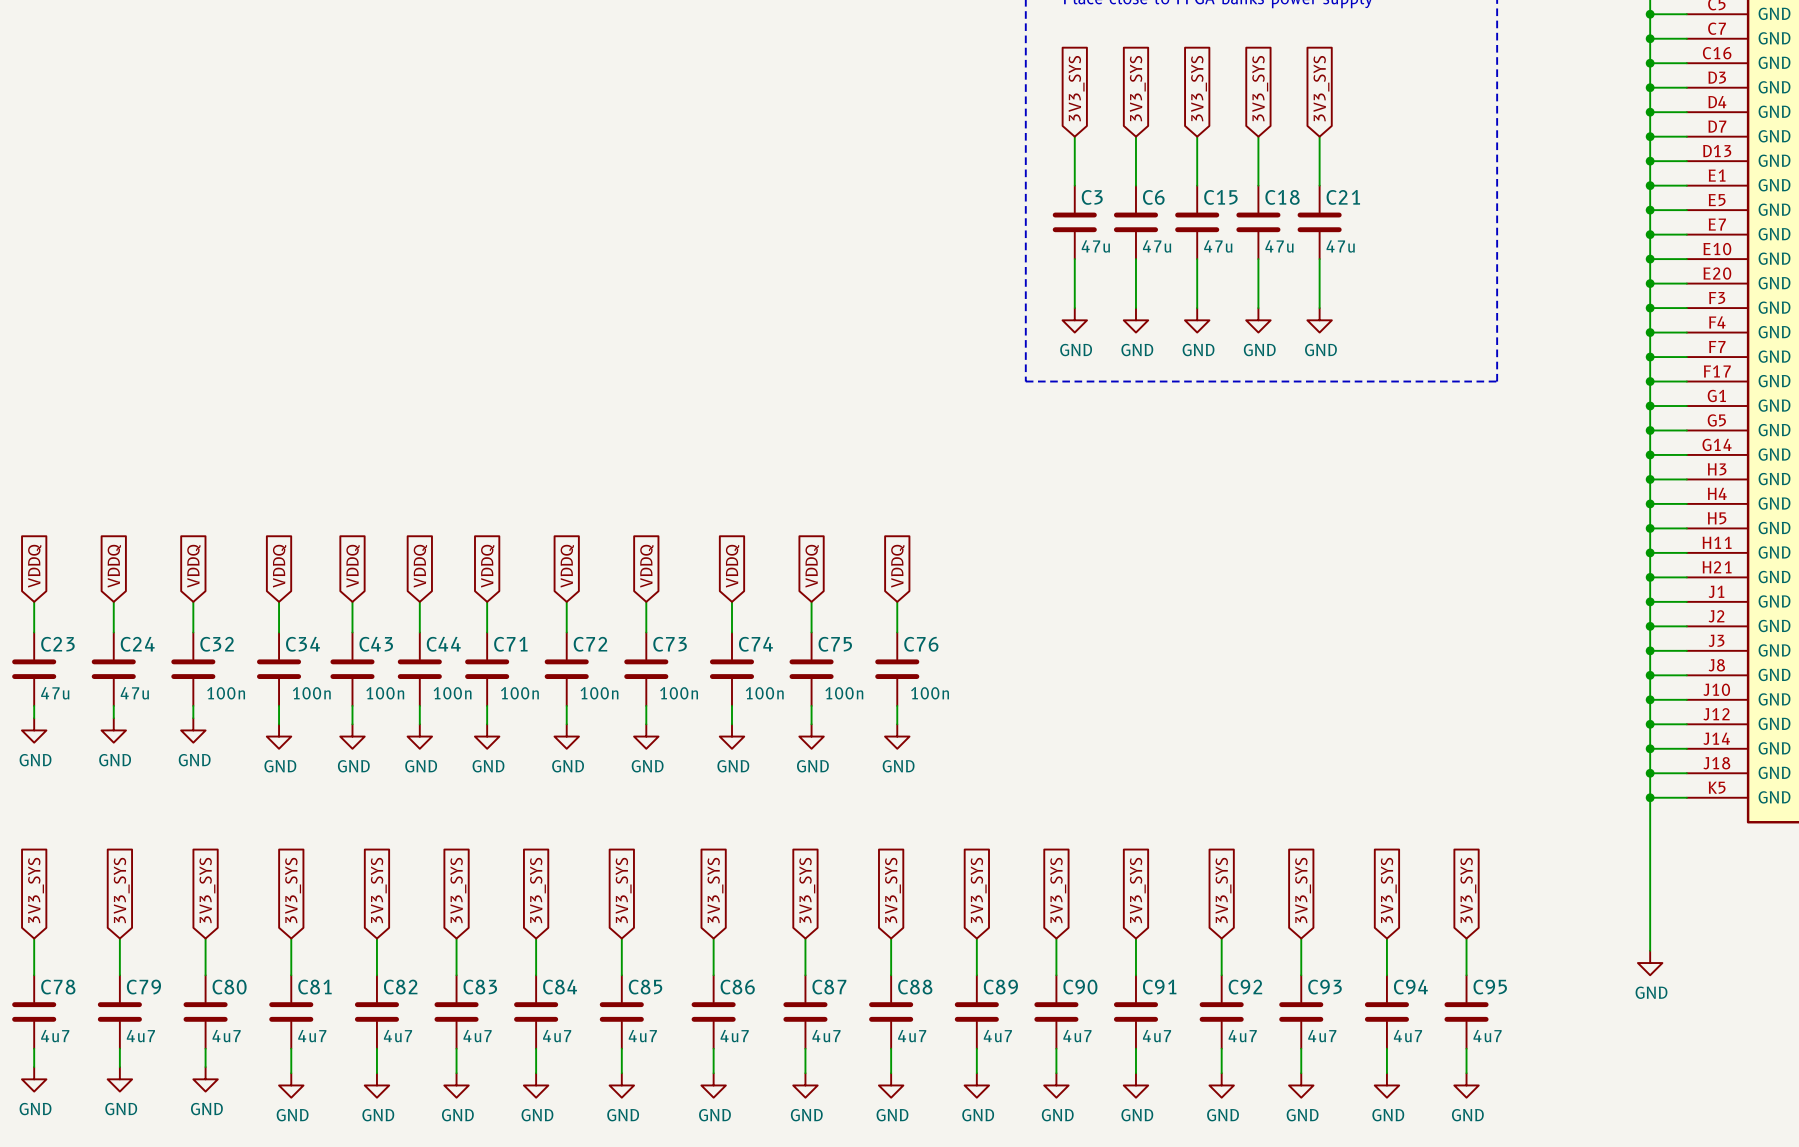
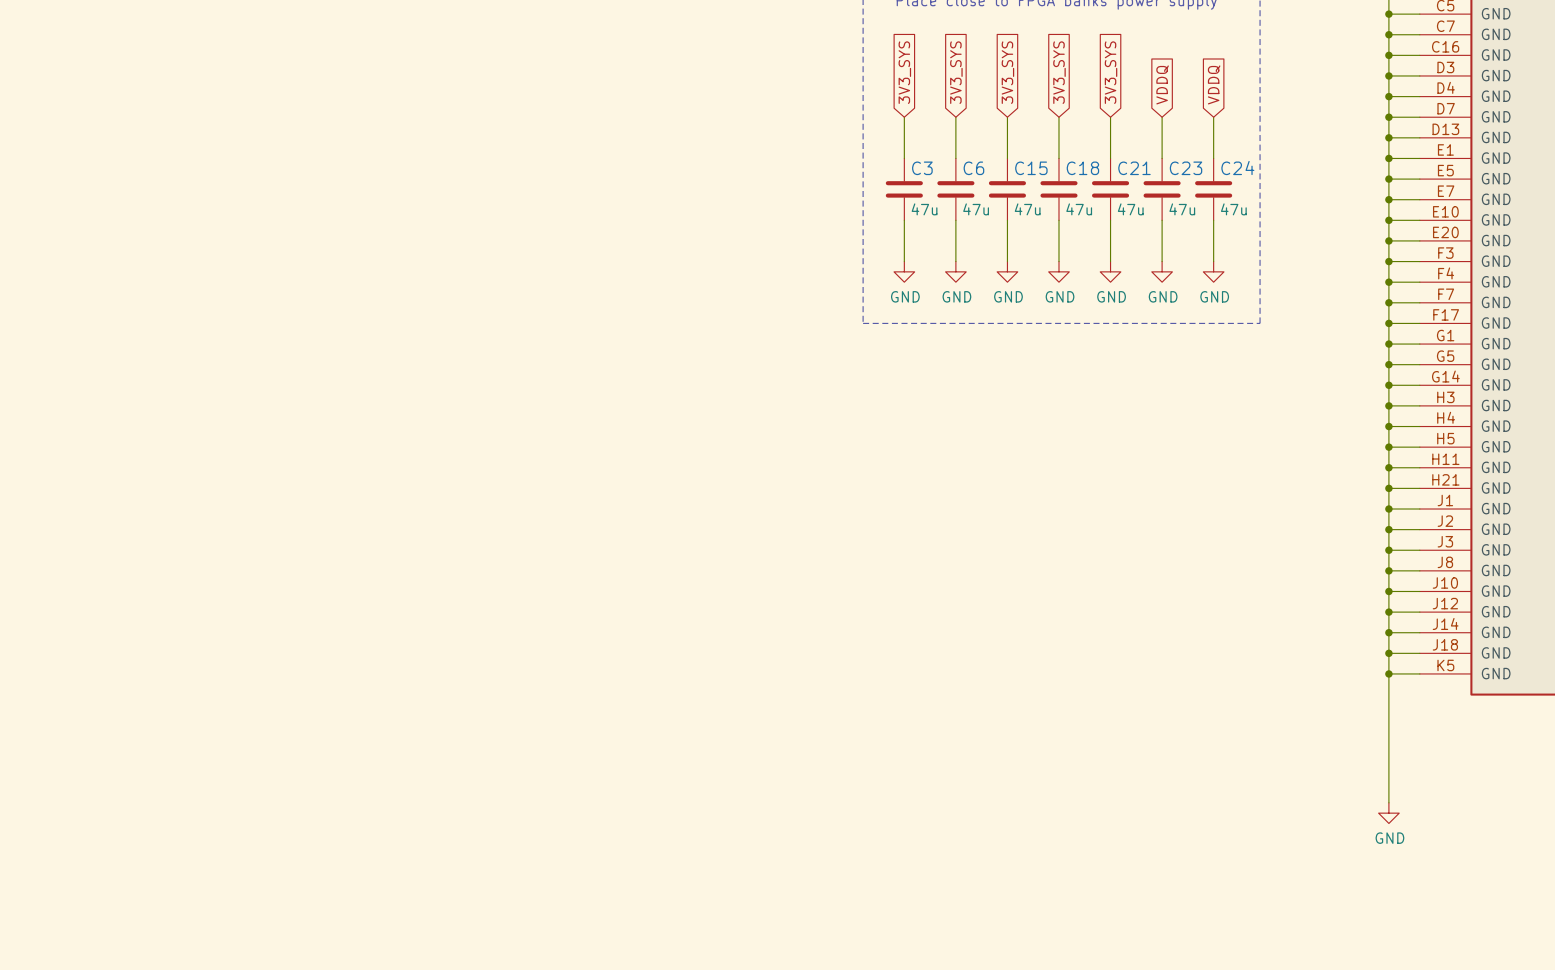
global label: none -> VDDQ (1162, 84)
global label: none -> VDDQ (1214, 84)
wire: none -> (1162, 117) (1162, 158)
wire: none -> (1213, 117) (1213, 158)
wire: none -> (1162, 220) (1162, 261)
wire: none -> (1213, 220) (1213, 261)
power symbol: none -> GND (1162, 271)
power symbol: none -> GND (1213, 271)
global label: VDDQ (34, 566) -> none
global label: VDDQ (114, 566) -> none
global label: VDDQ (193, 566) -> none
global label: VDDQ (279, 566) -> none
global label: VDDQ (353, 566) -> none
global label: VDDQ (420, 566) -> none
global label: VDDQ (487, 566) -> none
global label: VDDQ (567, 566) -> none
global label: VDDQ (646, 566) -> none
global label: VDDQ (732, 566) -> none
global label: VDDQ (812, 566) -> none
global label: VDDQ (897, 566) -> none
wire: (34, 601) (34, 632) -> none
wire: (113, 601) (113, 632) -> none
wire: (193, 601) (193, 632) -> none
wire: (279, 601) (279, 632) -> none
wire: (352, 601) (352, 632) -> none
wire: (419, 601) (419, 632) -> none
wire: (487, 601) (487, 632) -> none
wire: (566, 601) (566, 632) -> none
wire: (646, 601) (646, 632) -> none
wire: (731, 601) (731, 632) -> none
wire: (811, 601) (811, 632) -> none
wire: (897, 601) (897, 632) -> none
C23 position: (34, 669) -> (1162, 189)
C24 position: (113, 669) -> (1213, 189)
C32: (193, 669) -> none
C34: (279, 669) -> none
C43: (352, 669) -> none
C44: (419, 669) -> none
C71: (487, 669) -> none
C72: (566, 669) -> none
C73: (646, 669) -> none
C74: (731, 669) -> none
C75: (811, 669) -> none
C76: (897, 669) -> none
wire: (34, 705) (34, 718) -> none
wire: (113, 705) (113, 718) -> none
wire: (193, 705) (193, 718) -> none
wire: (279, 705) (279, 724) -> none
wire: (352, 705) (352, 724) -> none
wire: (419, 705) (419, 724) -> none
wire: (487, 705) (487, 724) -> none
wire: (566, 705) (566, 724) -> none
wire: (646, 705) (646, 724) -> none
wire: (731, 705) (731, 724) -> none
wire: (811, 705) (811, 724) -> none
wire: (897, 705) (897, 724) -> none
power symbol: GND (34, 730) -> none
power symbol: GND (113, 730) -> none
power symbol: GND (193, 730) -> none
power symbol: GND (279, 736) -> none
power symbol: GND (352, 736) -> none
power symbol: GND (419, 736) -> none
power symbol: GND (487, 736) -> none
power symbol: GND (566, 736) -> none
power symbol: GND (646, 736) -> none
power symbol: GND (731, 736) -> none
power symbol: GND (811, 736) -> none
power symbol: GND (897, 736) -> none
global label: 3V3_SYS (36, 890) -> none
global label: 3V3_SYS (121, 890) -> none
global label: 3V3_SYS (207, 890) -> none
global label: 3V3_SYS (293, 890) -> none
global label: 3V3_SYS (378, 890) -> none
global label: 3V3_SYS (458, 890) -> none
global label: 3V3_SYS (537, 890) -> none
global label: 3V3_SYS (623, 890) -> none
global label: 3V3_SYS (715, 890) -> none
global label: 3V3_SYS (807, 890) -> none
global label: 3V3_SYS (892, 890) -> none
global label: 3V3_SYS (978, 890) -> none
global label: 3V3_SYS (1058, 890) -> none
global label: 3V3_SYS (1137, 890) -> none
global label: 3V3_SYS (1223, 890) -> none
global label: 3V3_SYS (1303, 890) -> none
global label: 3V3_SYS (1388, 890) -> none
global label: 3V3_SYS (1468, 890) -> none
wire: (34, 938) (34, 975) -> none
wire: (119, 938) (119, 975) -> none
wire: (205, 938) (205, 975) -> none
wire: (291, 938) (291, 975) -> none
wire: (376, 938) (376, 975) -> none
wire: (456, 938) (456, 975) -> none
wire: (536, 938) (536, 975) -> none
wire: (621, 938) (621, 975) -> none
wire: (713, 938) (713, 975) -> none
wire: (805, 938) (805, 975) -> none
wire: (891, 938) (891, 975) -> none
wire: (976, 938) (976, 975) -> none
wire: (1056, 938) (1056, 975) -> none
wire: (1135, 938) (1135, 975) -> none
wire: (1221, 938) (1221, 975) -> none
wire: (1301, 938) (1301, 975) -> none
wire: (1386, 938) (1386, 975) -> none
wire: (1466, 938) (1466, 975) -> none
C78: (34, 1011) -> none
C79: (119, 1011) -> none
C80: (205, 1011) -> none
C81: (291, 1011) -> none
C82: (376, 1011) -> none
C83: (456, 1011) -> none
C84: (536, 1011) -> none
C85: (621, 1011) -> none
C86: (713, 1011) -> none
C87: (805, 1011) -> none
C88: (891, 1011) -> none
C89: (976, 1011) -> none
C90: (1056, 1011) -> none
C91: (1135, 1011) -> none
C92: (1221, 1011) -> none
C93: (1301, 1011) -> none
C94: (1386, 1011) -> none
C95: (1466, 1011) -> none
wire: (34, 1048) (34, 1067) -> none
wire: (119, 1048) (119, 1067) -> none
wire: (205, 1048) (205, 1067) -> none
wire: (291, 1048) (291, 1073) -> none
wire: (376, 1048) (376, 1073) -> none
wire: (456, 1048) (456, 1073) -> none
wire: (536, 1048) (536, 1073) -> none
wire: (621, 1048) (621, 1073) -> none
wire: (713, 1048) (713, 1073) -> none
wire: (805, 1048) (805, 1073) -> none
wire: (891, 1048) (891, 1073) -> none
wire: (976, 1048) (976, 1073) -> none
wire: (1056, 1048) (1056, 1073) -> none
wire: (1135, 1048) (1135, 1073) -> none
wire: (1221, 1048) (1221, 1073) -> none
wire: (1301, 1048) (1301, 1073) -> none
wire: (1386, 1048) (1386, 1073) -> none
wire: (1466, 1048) (1466, 1073) -> none
power symbol: GND (34, 1079) -> none
power symbol: GND (119, 1079) -> none
power symbol: GND (205, 1079) -> none
power symbol: GND (291, 1085) -> none
power symbol: GND (376, 1085) -> none
power symbol: GND (456, 1085) -> none
power symbol: GND (536, 1085) -> none
power symbol: GND (621, 1085) -> none
power symbol: GND (713, 1085) -> none
power symbol: GND (805, 1085) -> none
power symbol: GND (891, 1085) -> none
power symbol: GND (976, 1085) -> none
power symbol: GND (1056, 1085) -> none
power symbol: GND (1135, 1085) -> none
power symbol: GND (1221, 1085) -> none
power symbol: GND (1301, 1085) -> none
power symbol: GND (1386, 1085) -> none
power symbol: GND (1466, 1085) -> none

